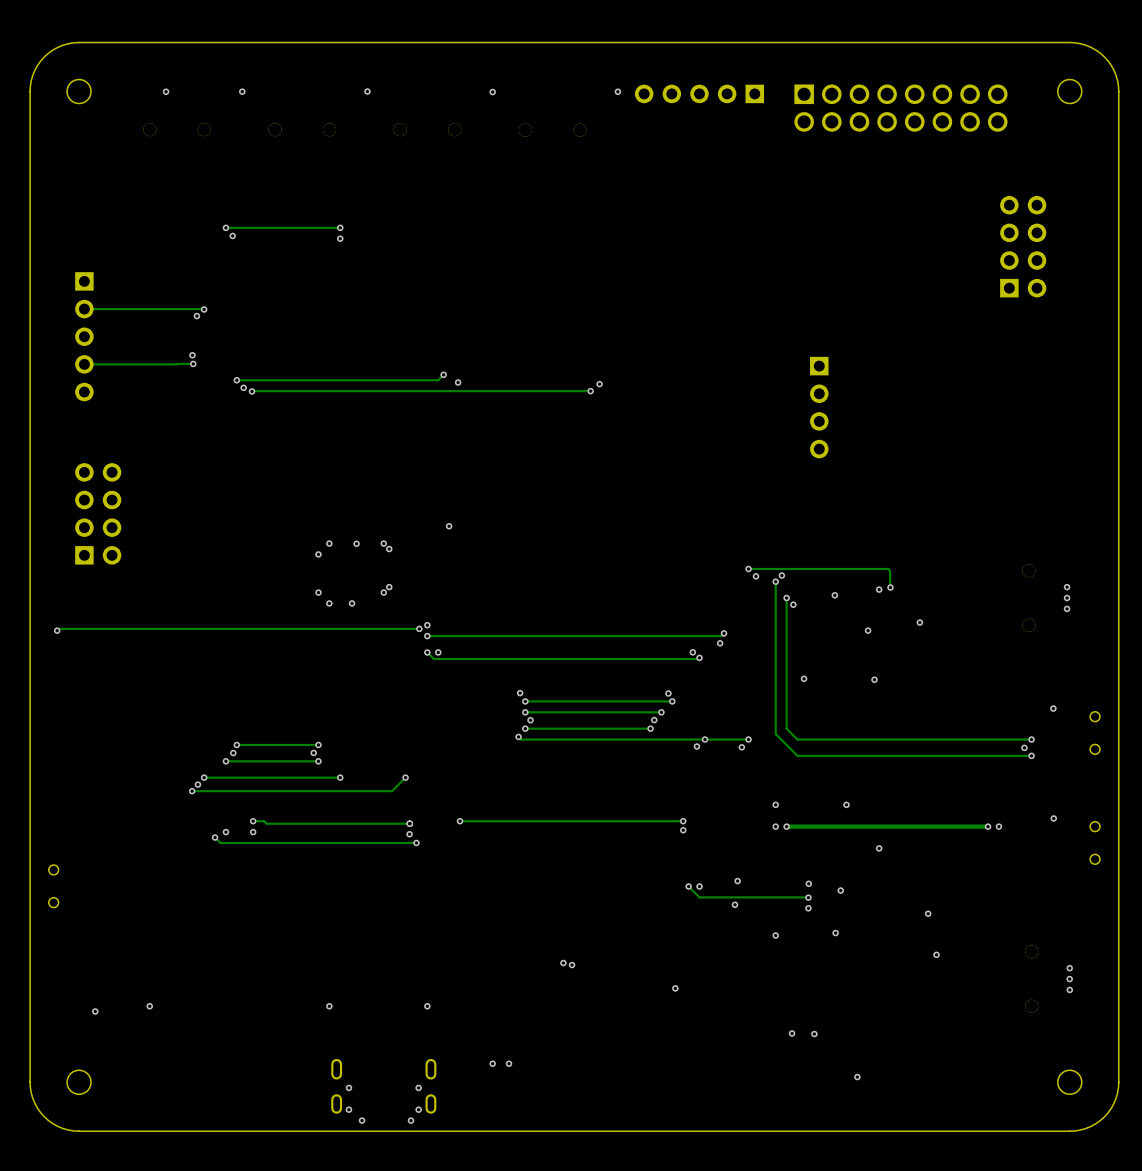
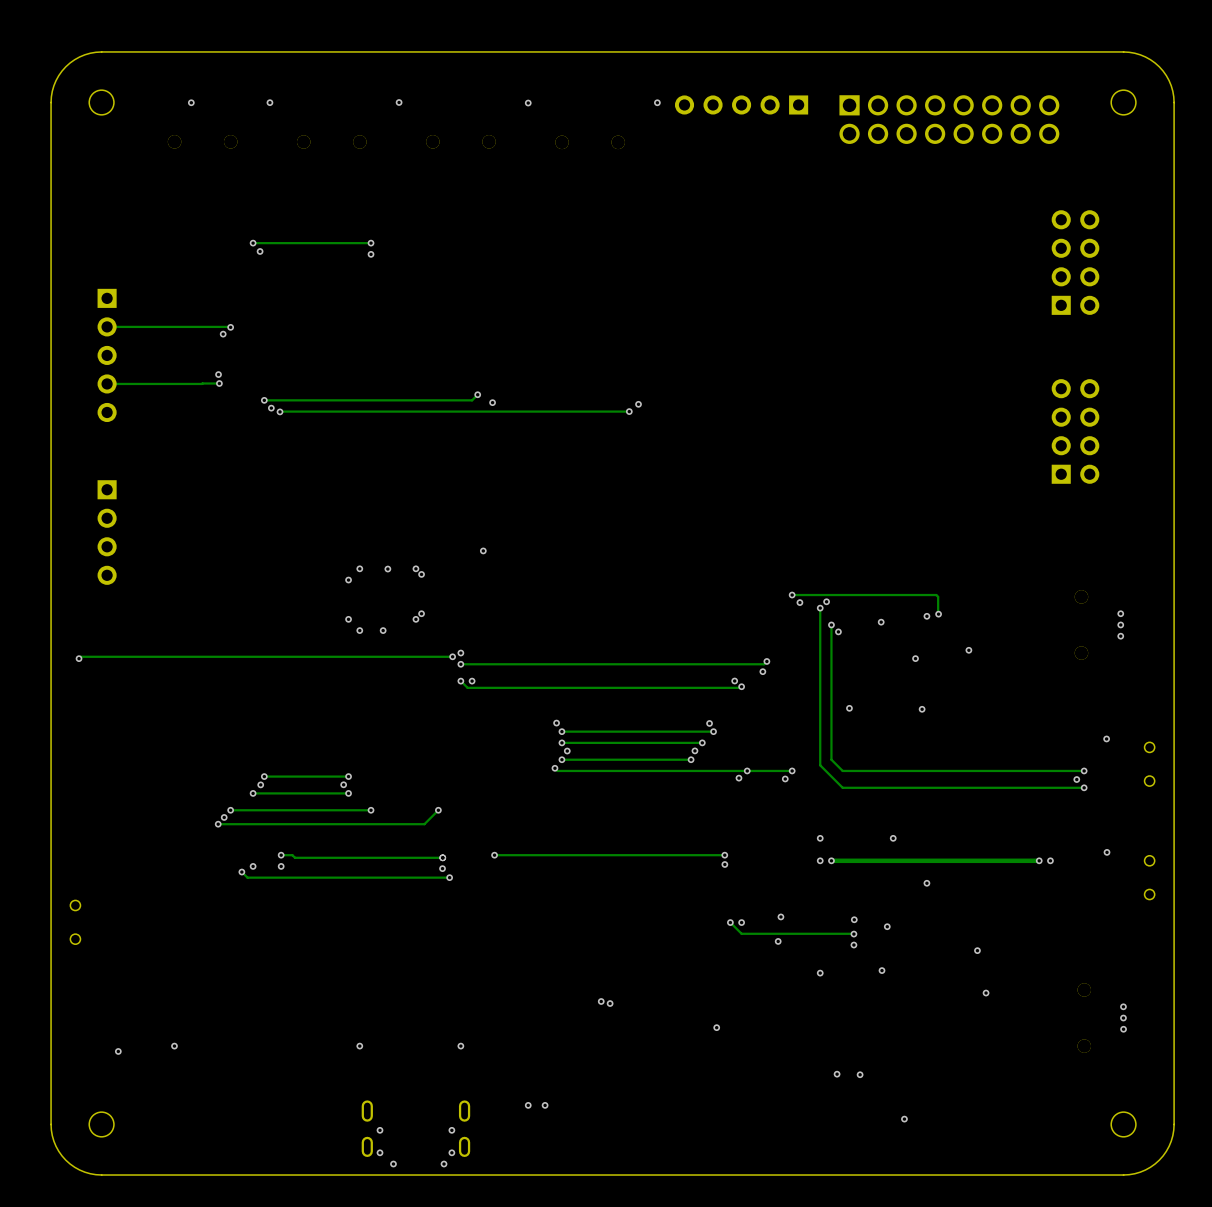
part: (819, 407) -> none
part: none -> (1075, 431)
part: none -> (107, 532)
part: (98, 513) -> none

